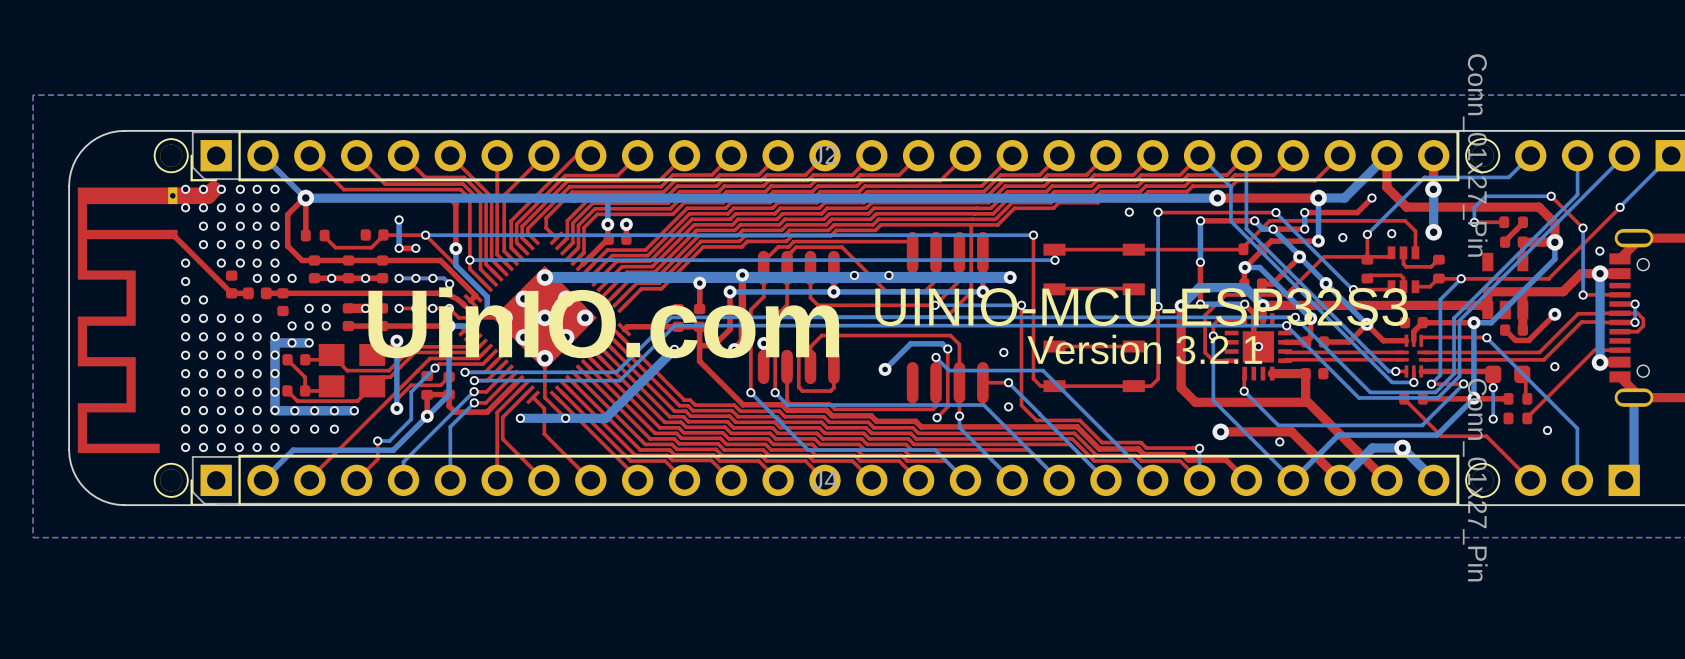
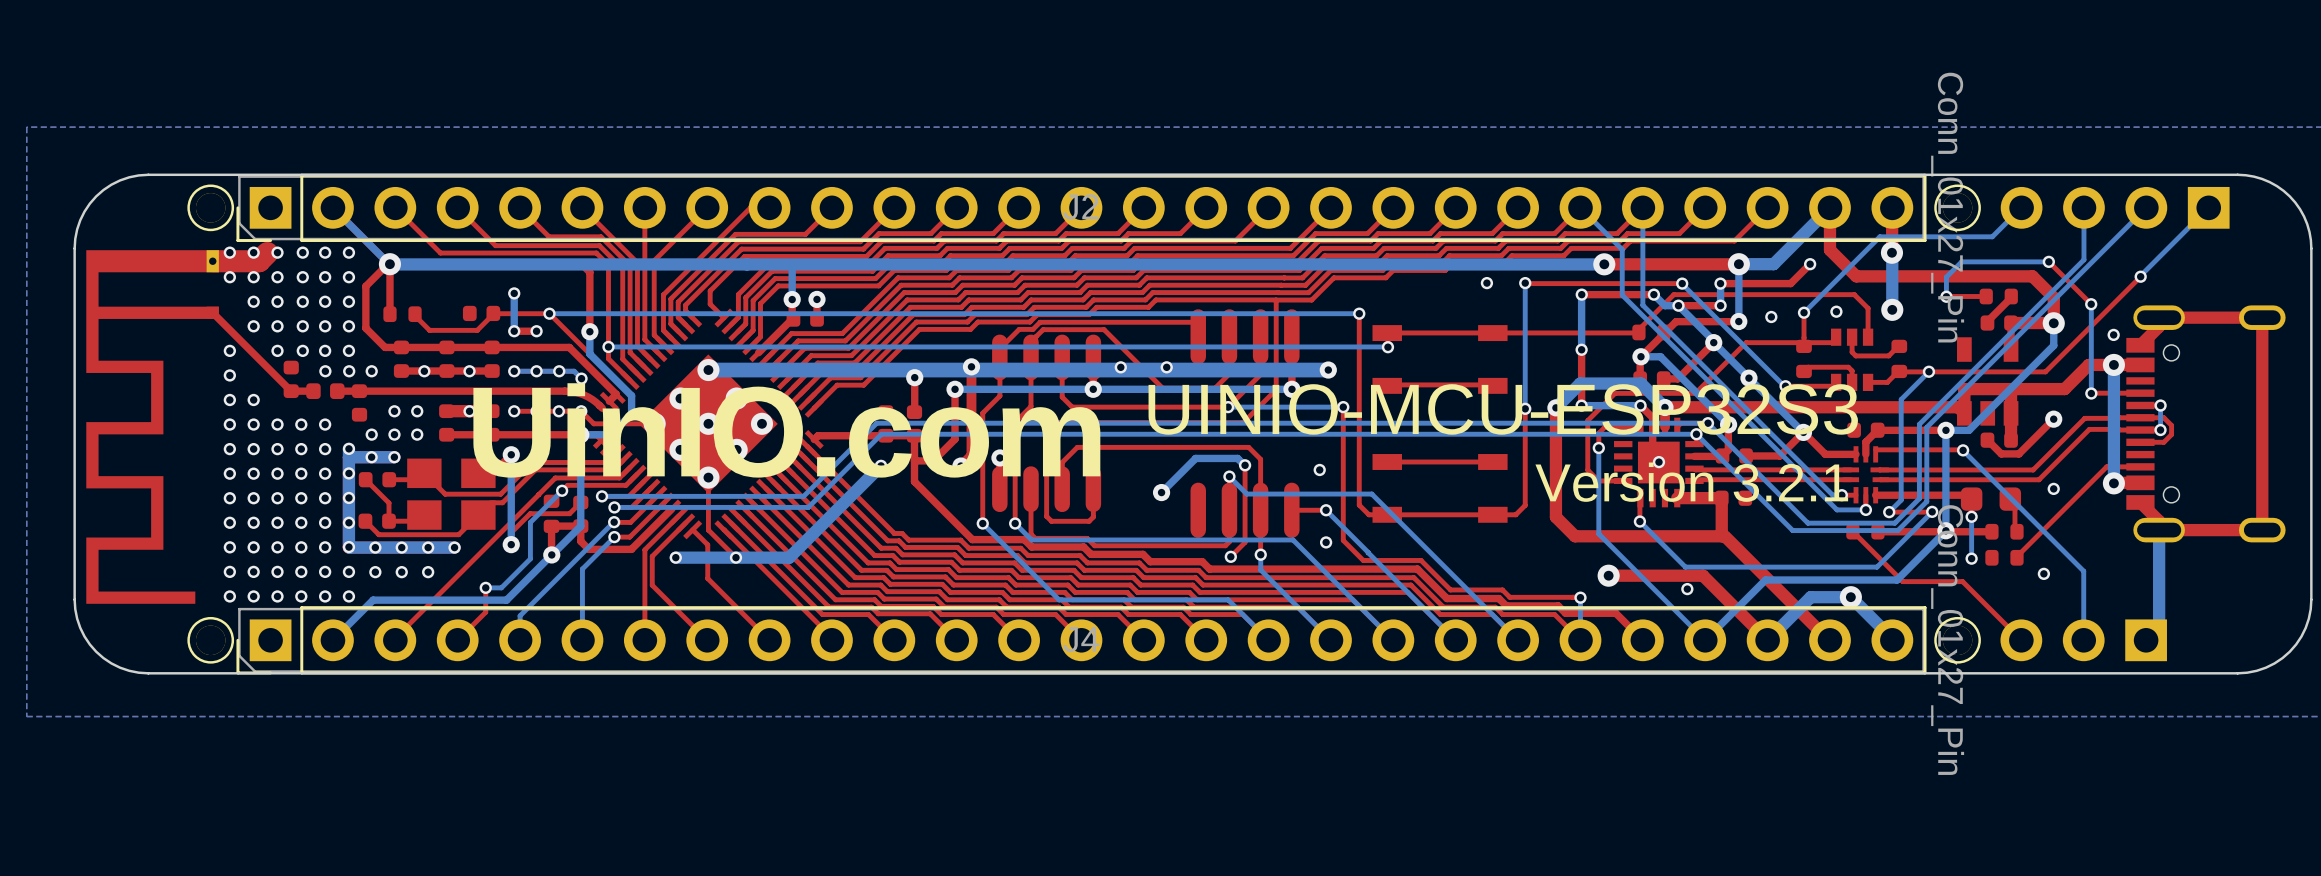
text position: Version 3.2.1 (1144, 349) -> Version 3.2.1 (1691, 482)

